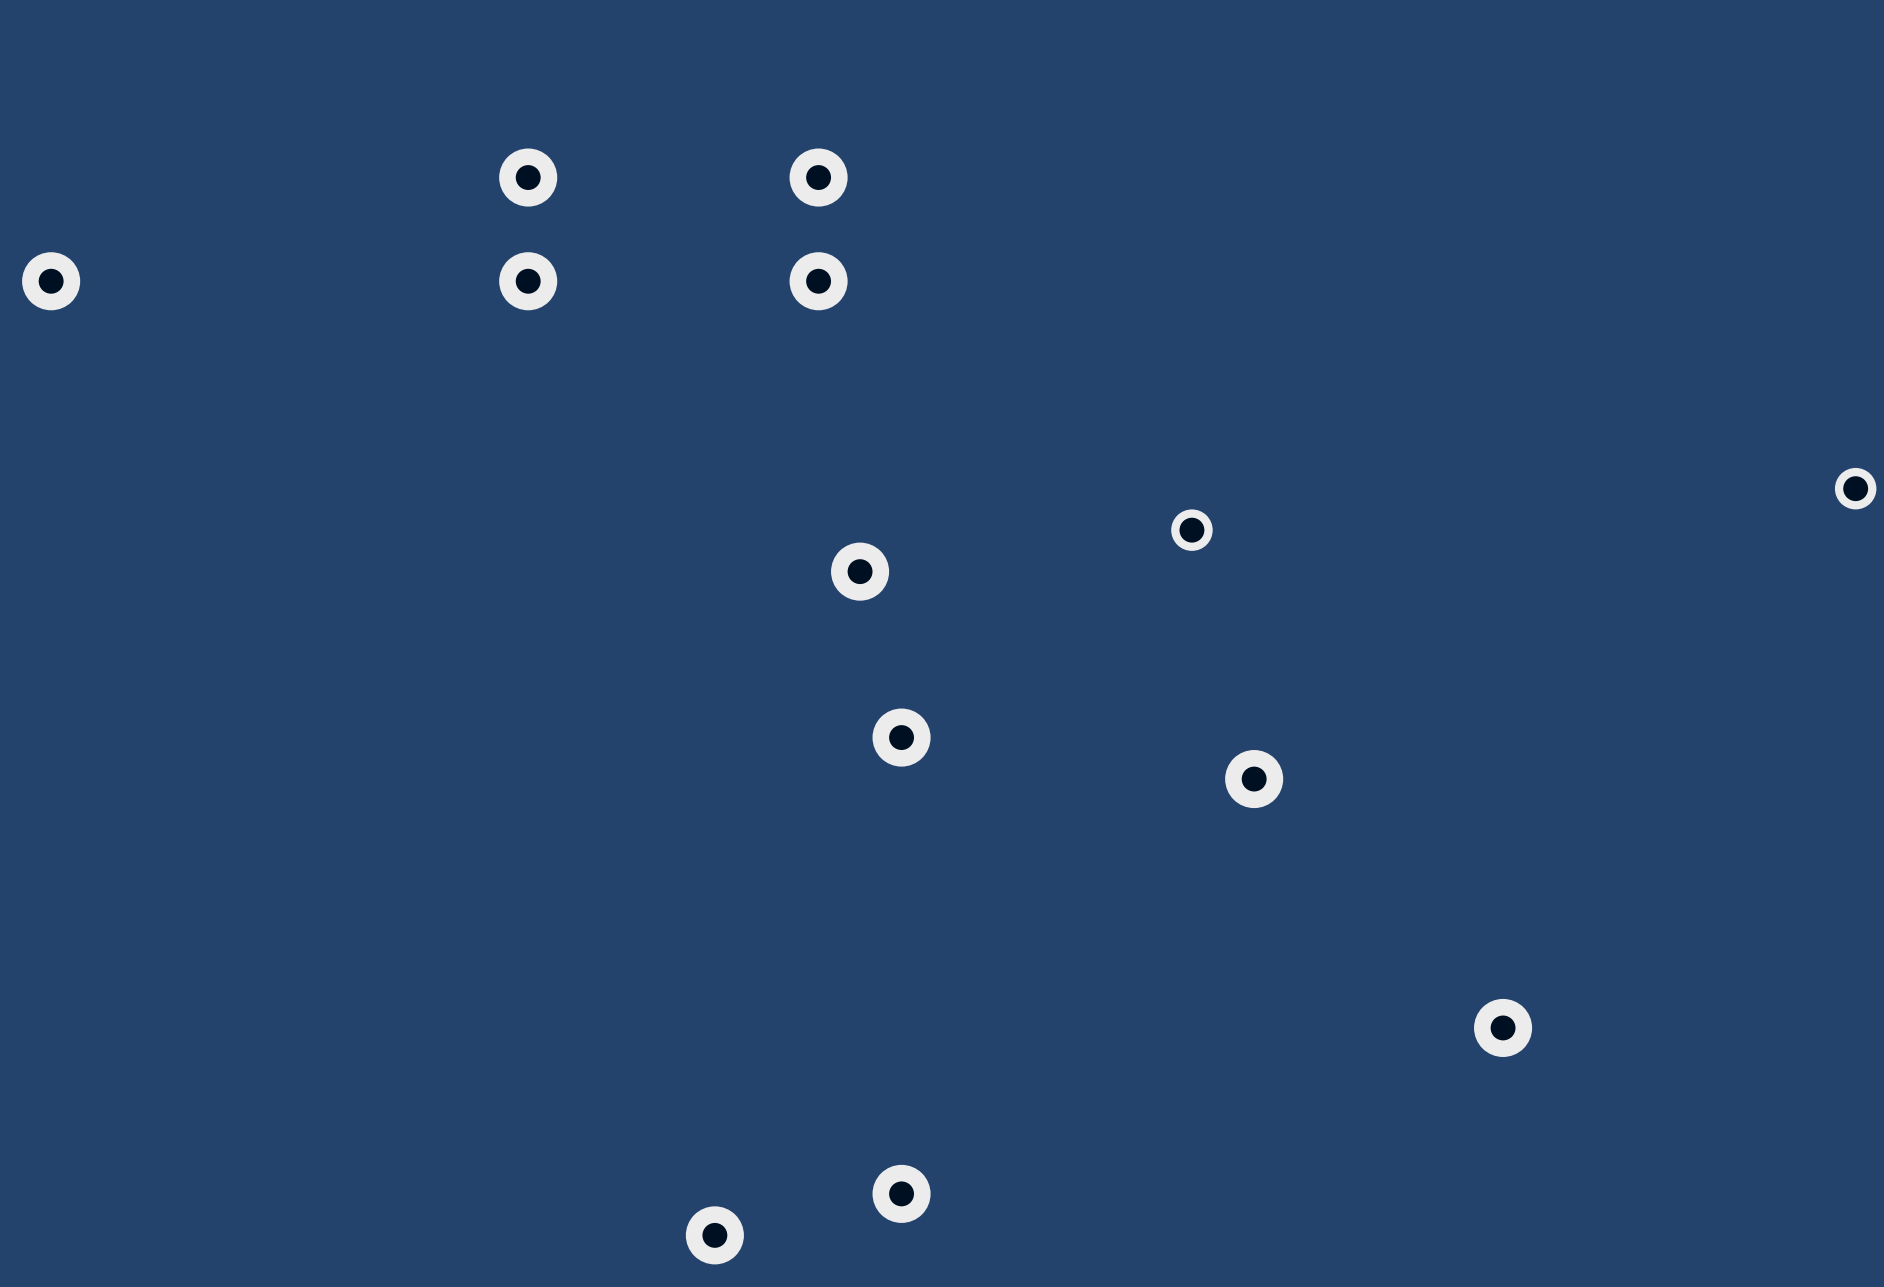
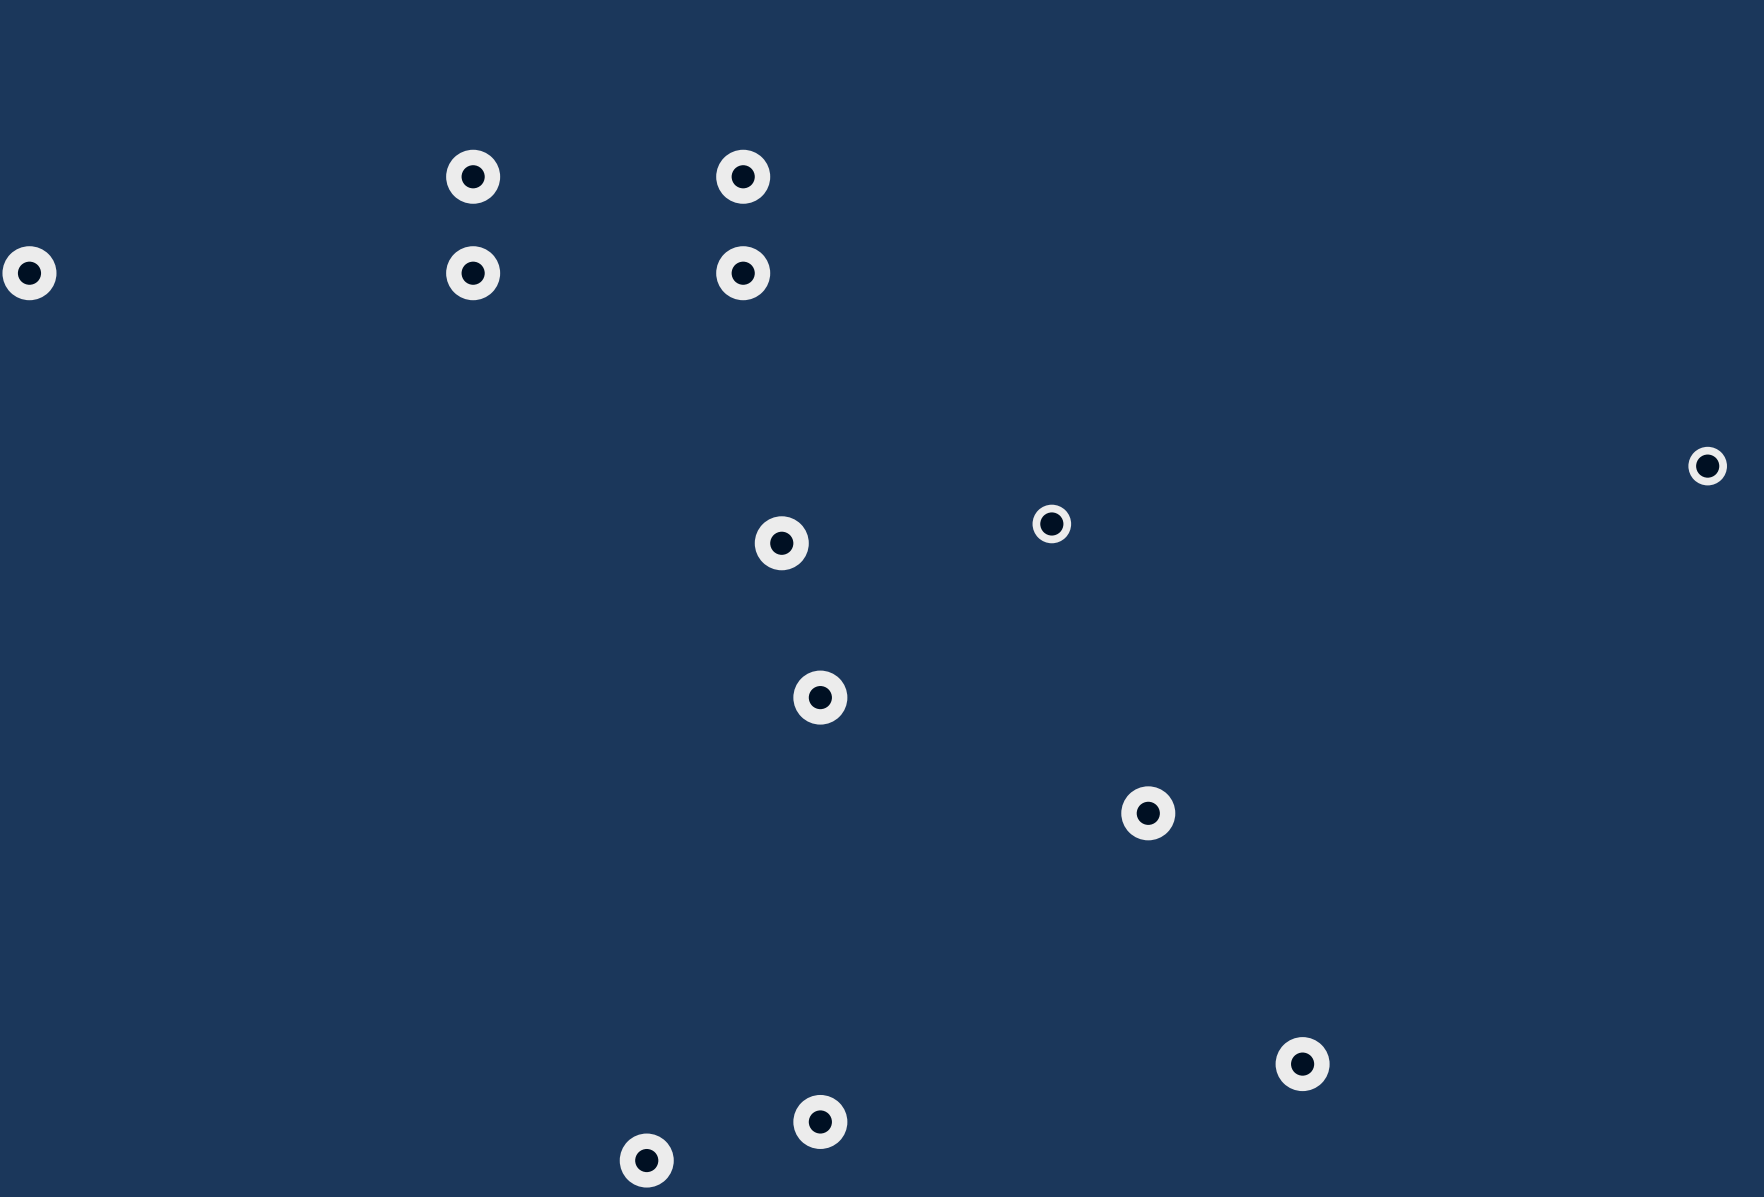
via position: (1191, 530) -> (1051, 523)
via position: (1254, 779) -> (1148, 813)
via position: (1503, 1027) -> (1302, 1064)

